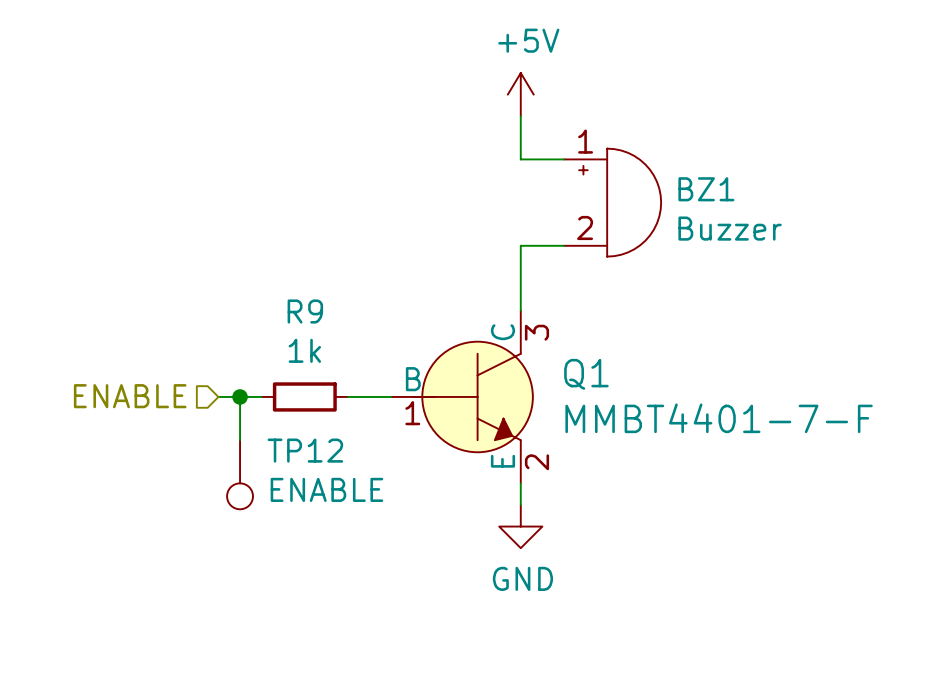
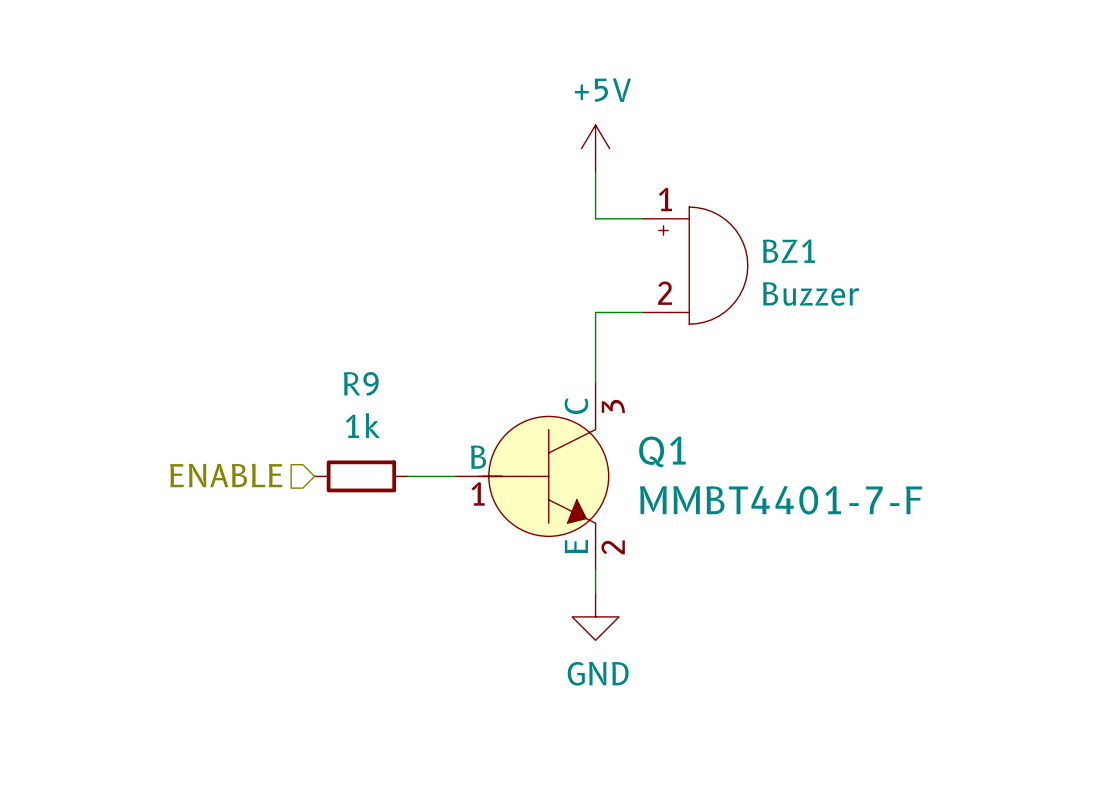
hierarchical label position: ENABLE (130, 396) -> ENABLE (226, 475)
wire: (218, 396) (261, 396) -> none
wire: (240, 396) (240, 440) -> none
junction: (240, 396) -> none
TP12: ENABLE (240, 474) -> none

